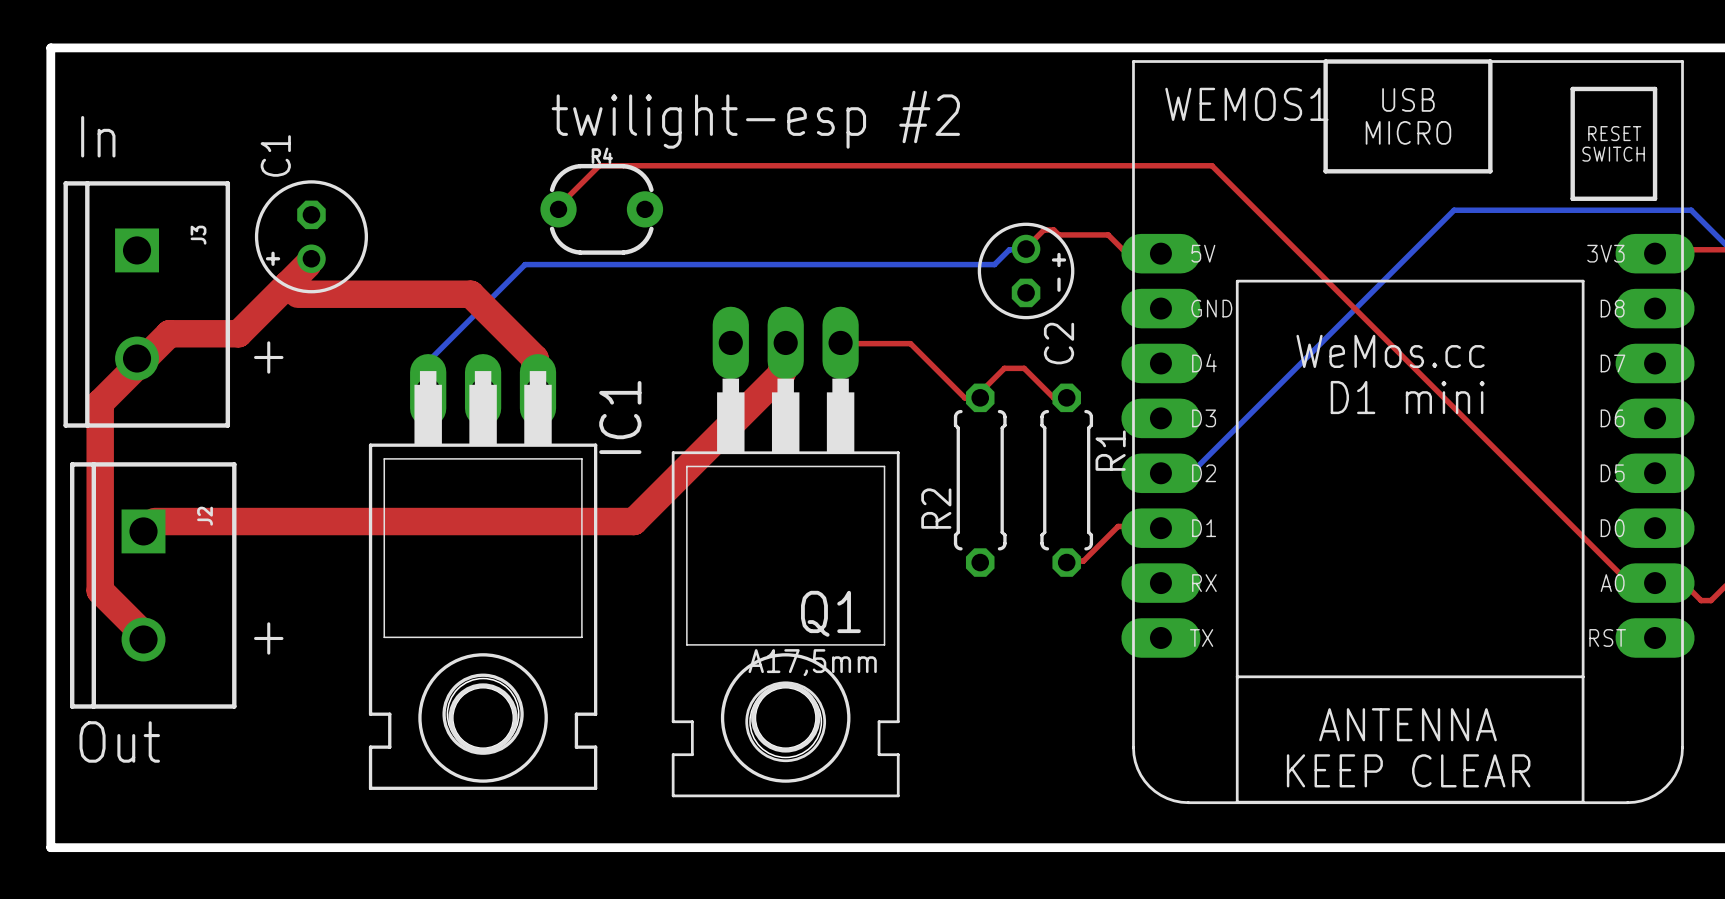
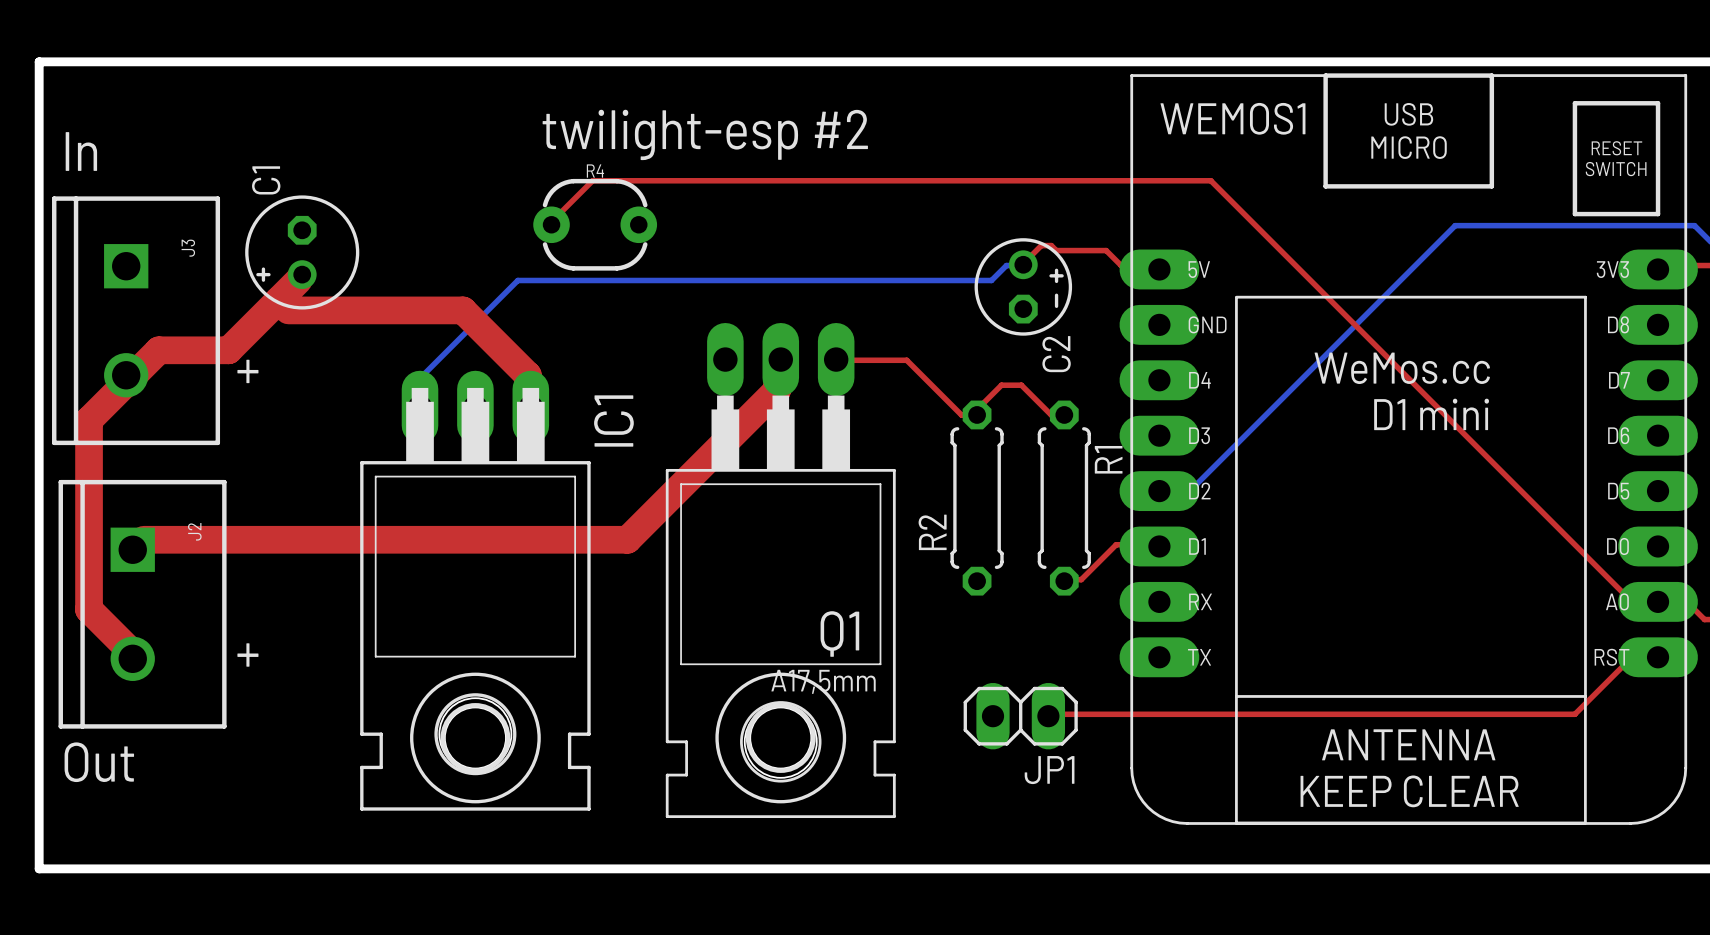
top track: none -> (1658, 657) (1654, 659) (1629, 659) (1574, 714) (1051, 714) (1048, 716)
JP1: none -> (1020, 716)

